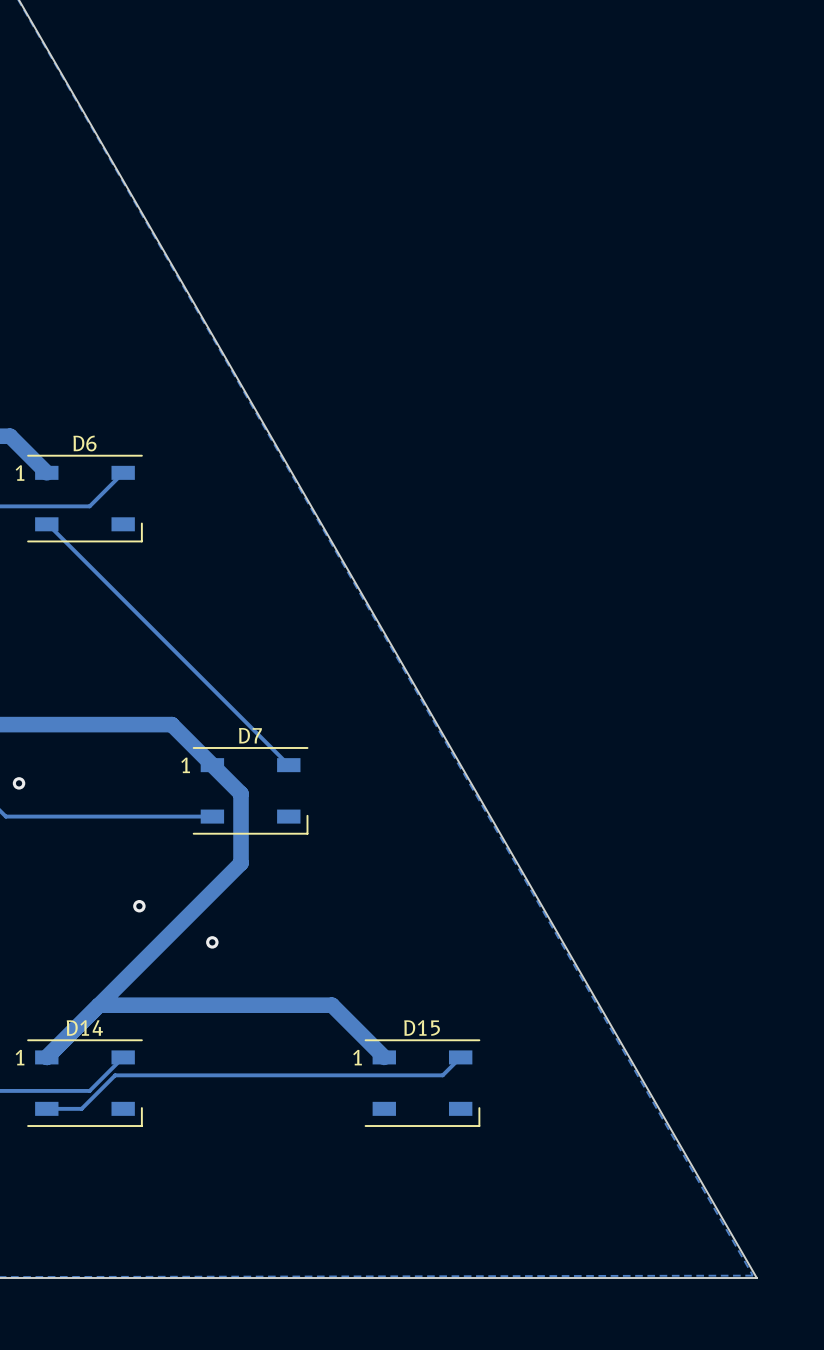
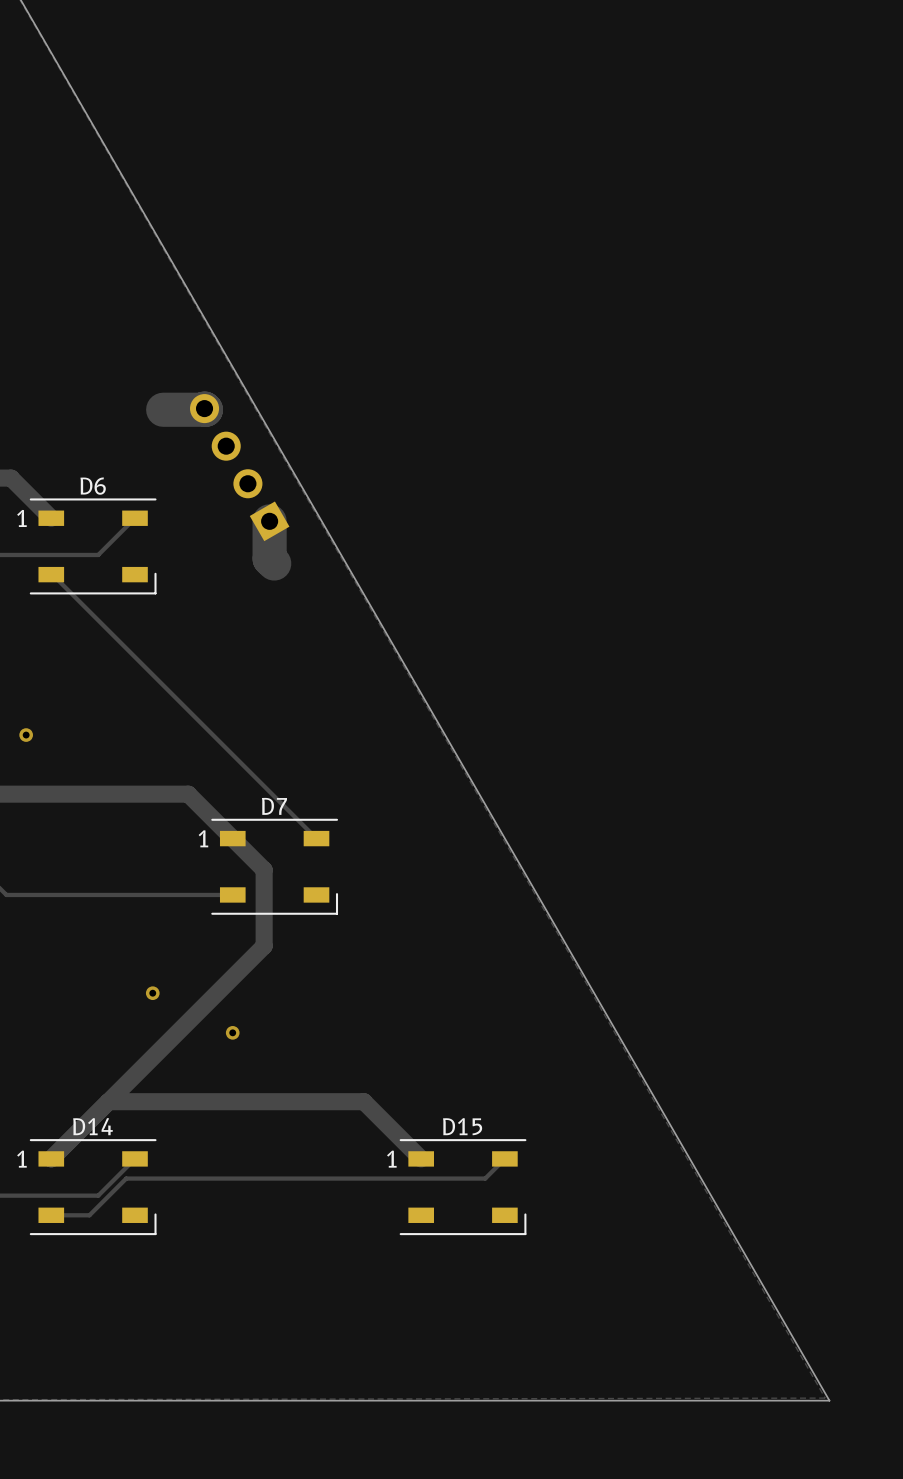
track: none -> (204, 408) (205, 409) (163, 409)
part: none -> (239, 467)
track: none -> (269, 521) (269, 558) (274, 563)
via: none -> (26, 735)
via: (19, 783) -> none

